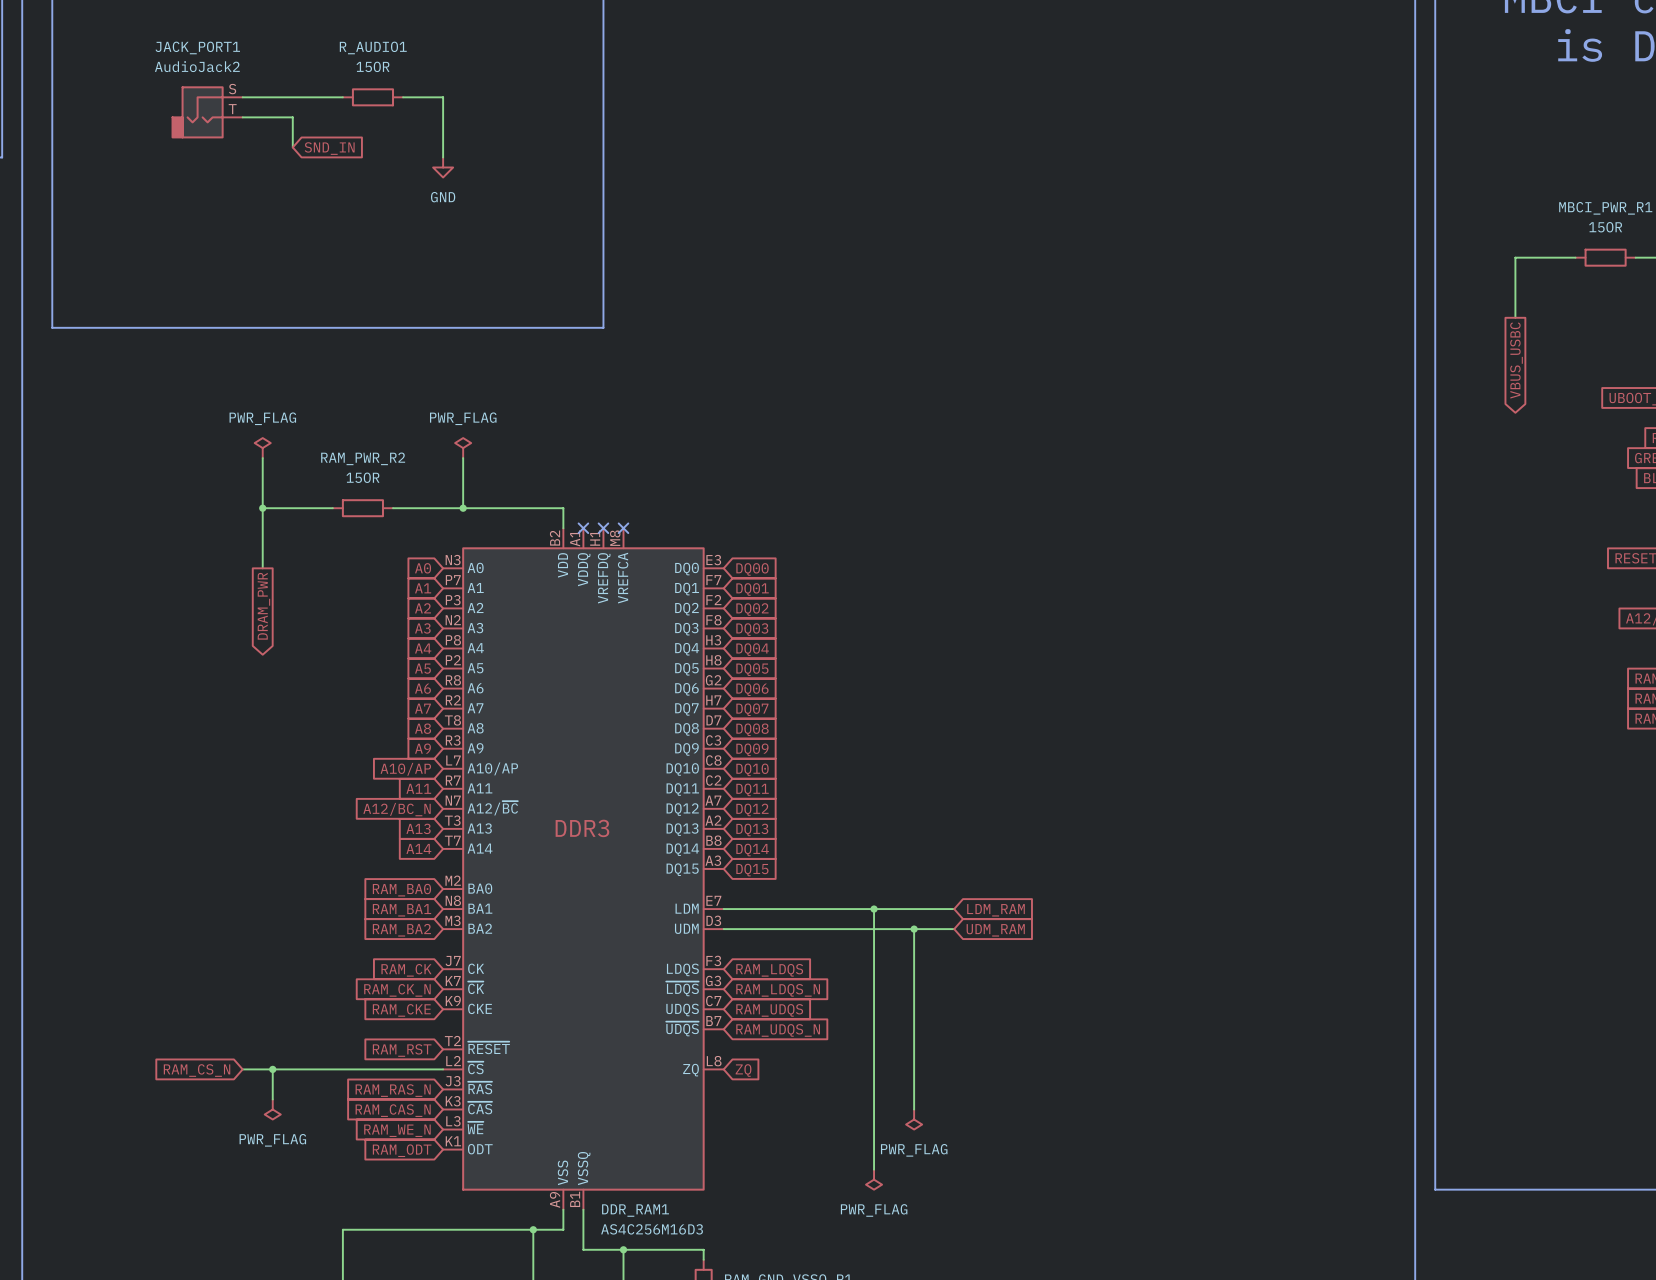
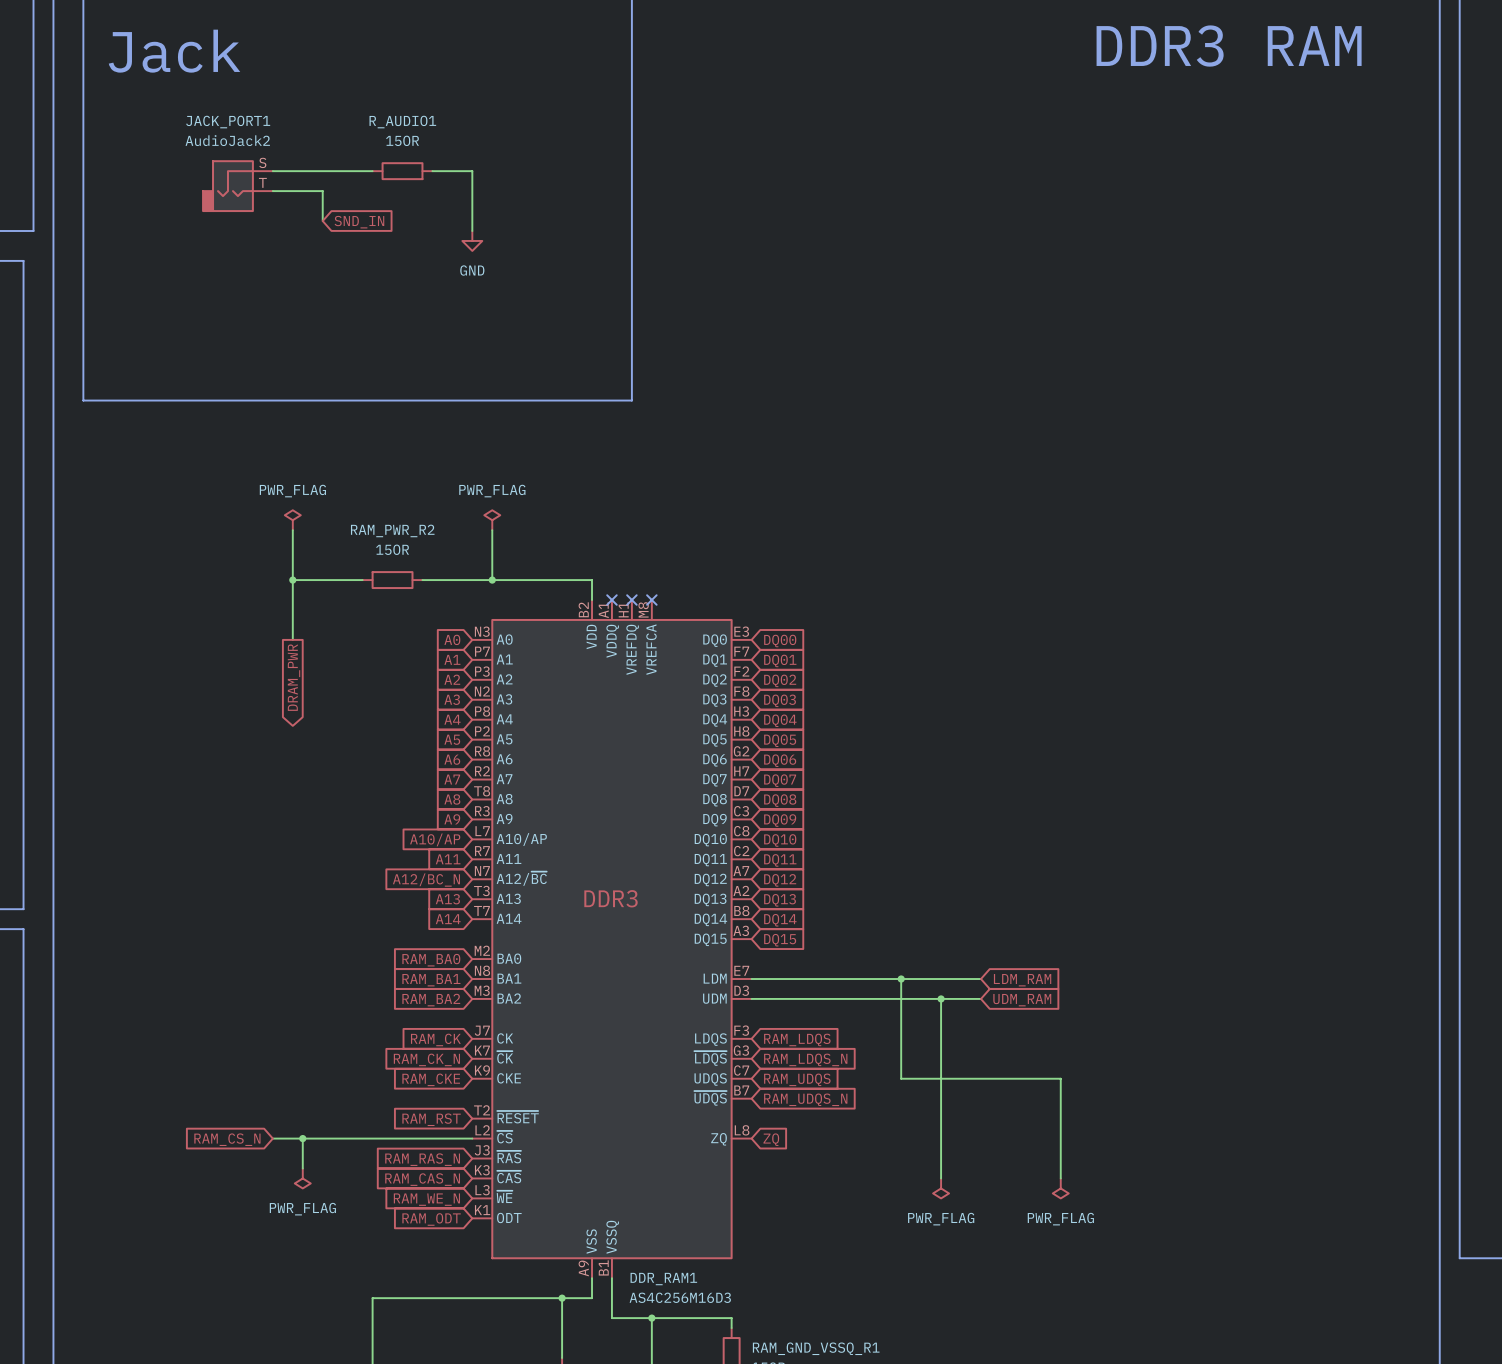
wire: (874, 1009) (874, 1169) -> (901, 1078) (1060, 1078) (1060, 1178)
power symbol position: PWR_FLAG (874, 1179) -> PWR_FLAG (1060, 1188)

